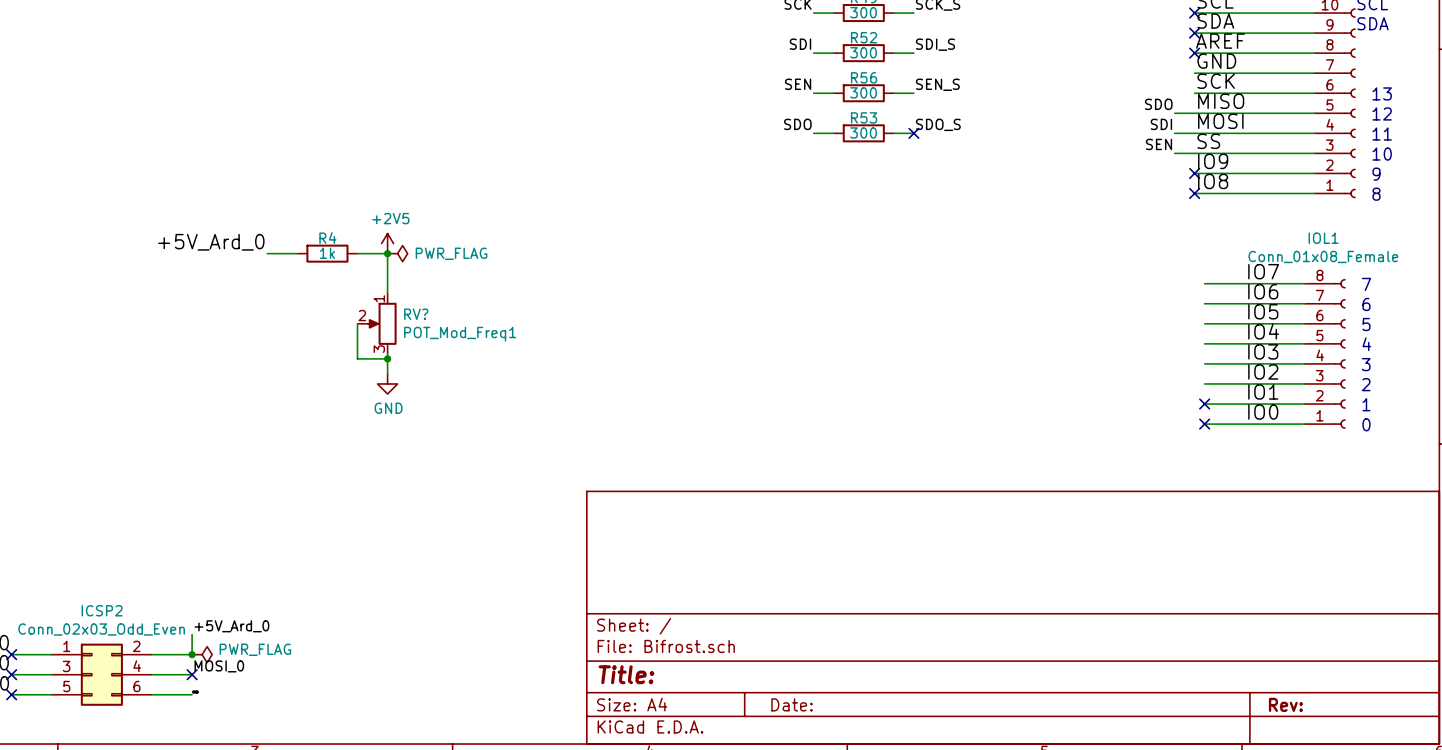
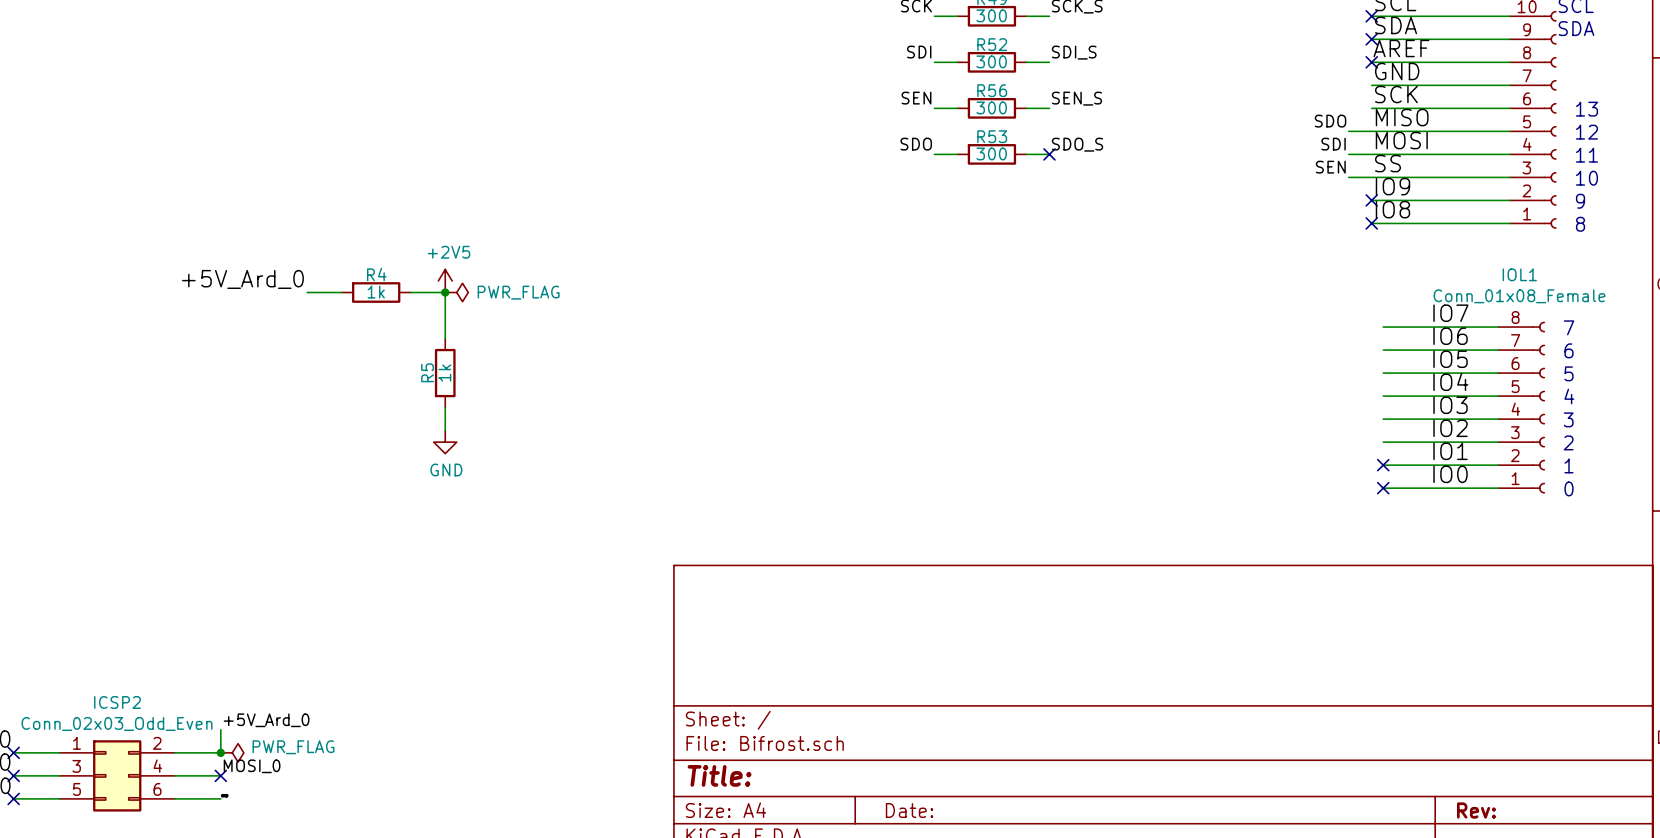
wire: (357, 323) (357, 358) (387, 358) -> none
RV?: POT_Mod_Freq1 (377, 323) -> none
R5: none -> 1k (445, 373)
junction: (387, 358) -> none

